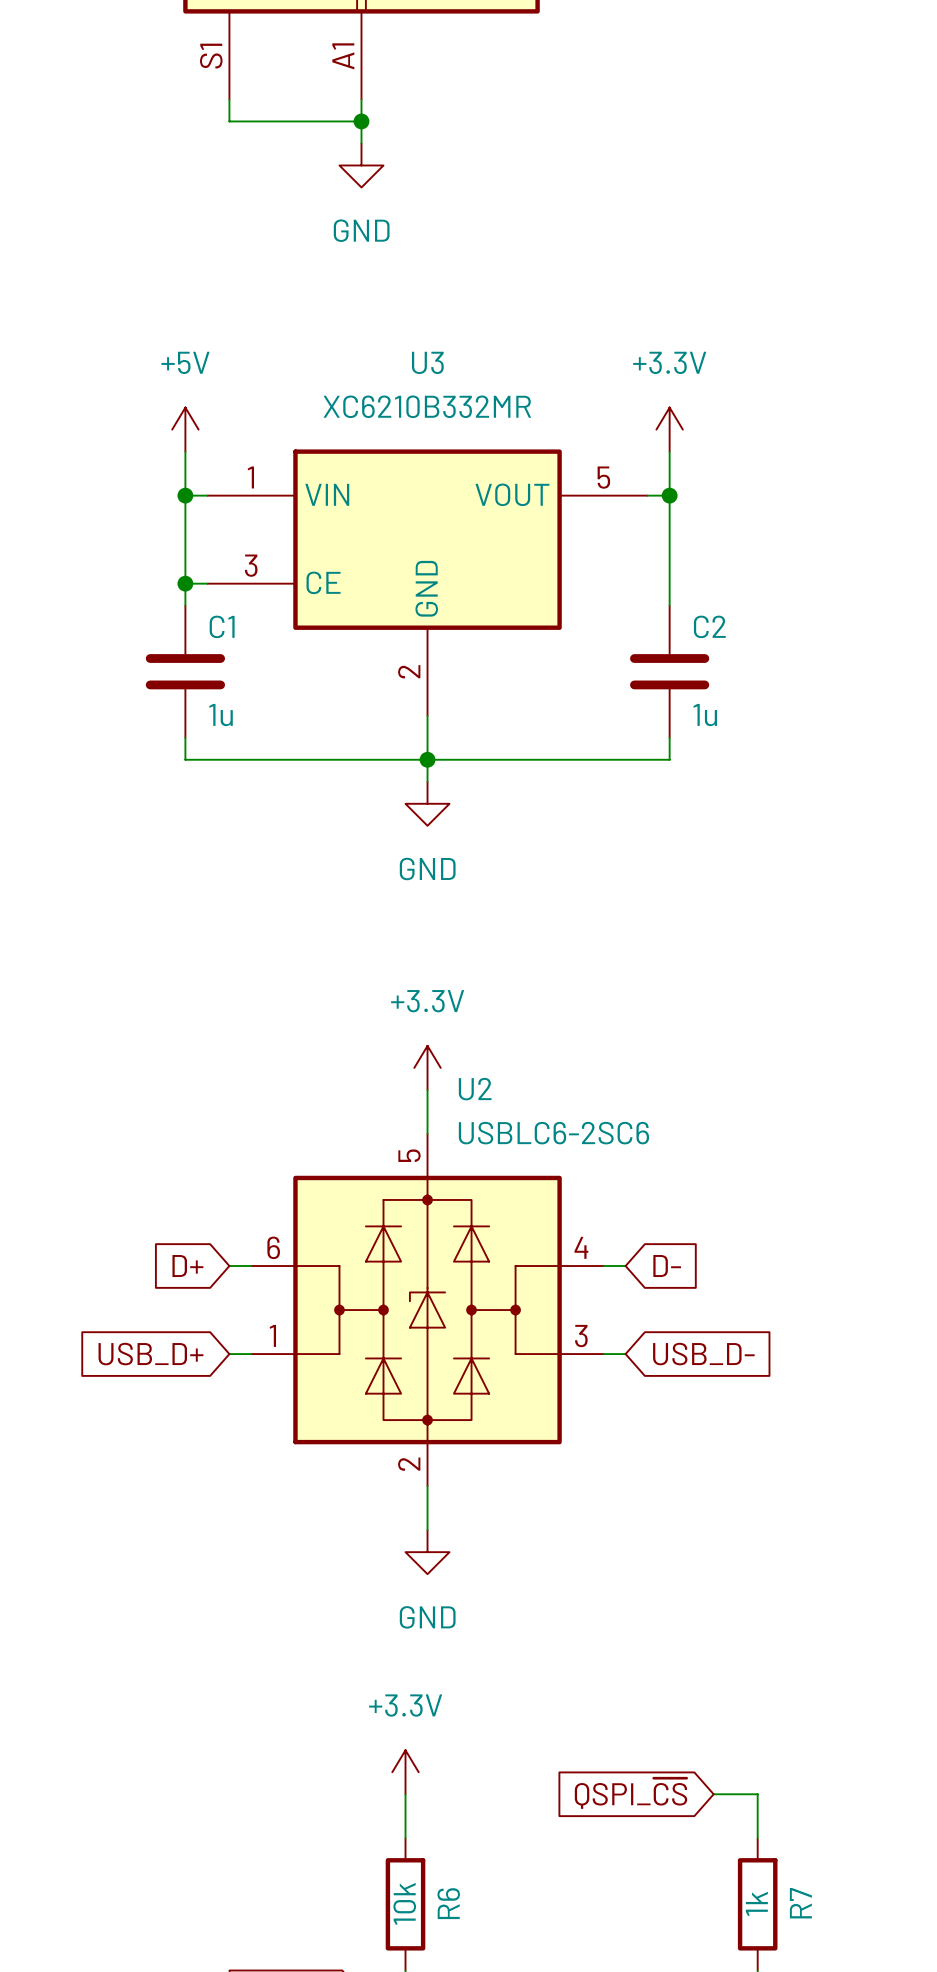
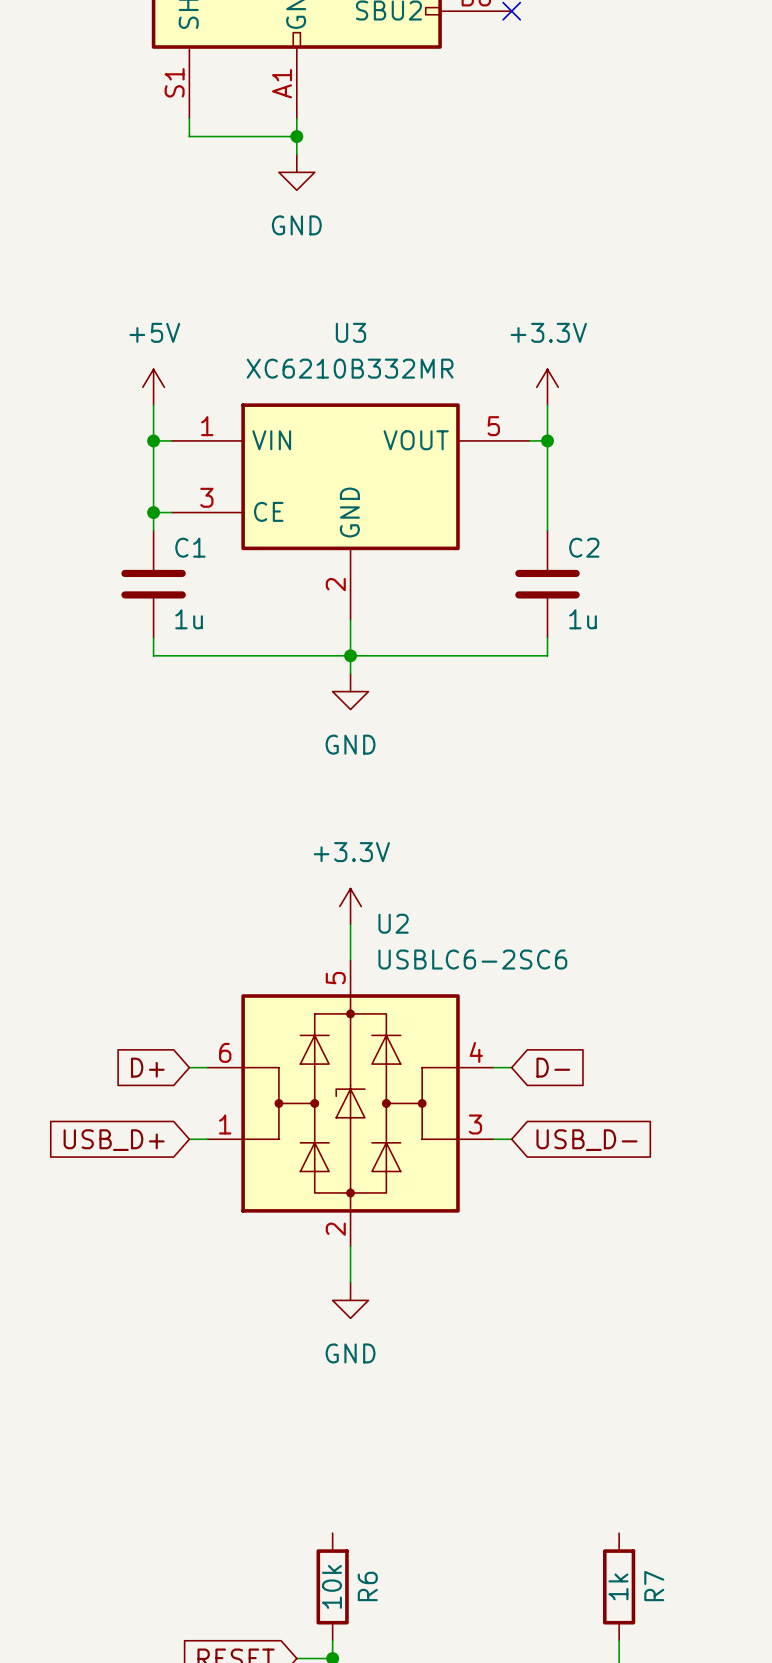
power symbol: +3.3V (405, 1772) -> none
global label: QSPI_~{CS} (631, 1793) -> none
wire: (405, 1794) (405, 1838) -> none
wire: (713, 1794) (757, 1794) (757, 1838) -> none

